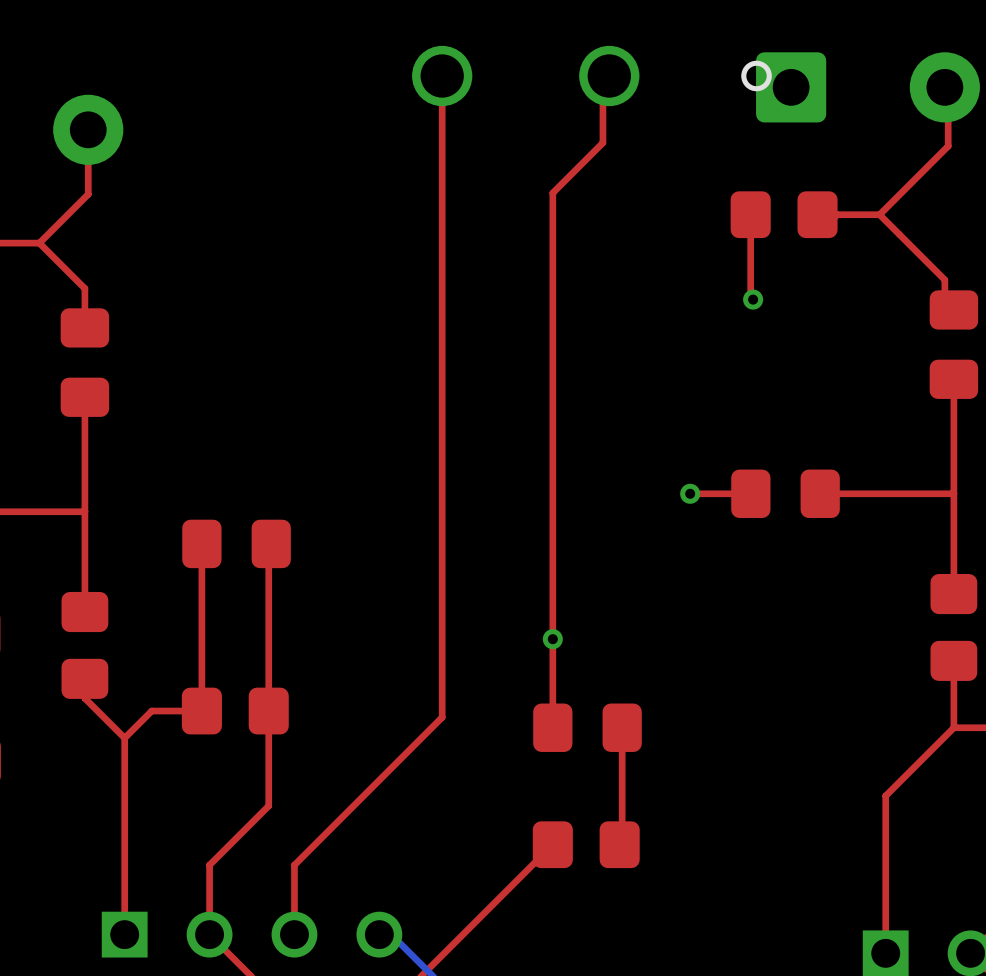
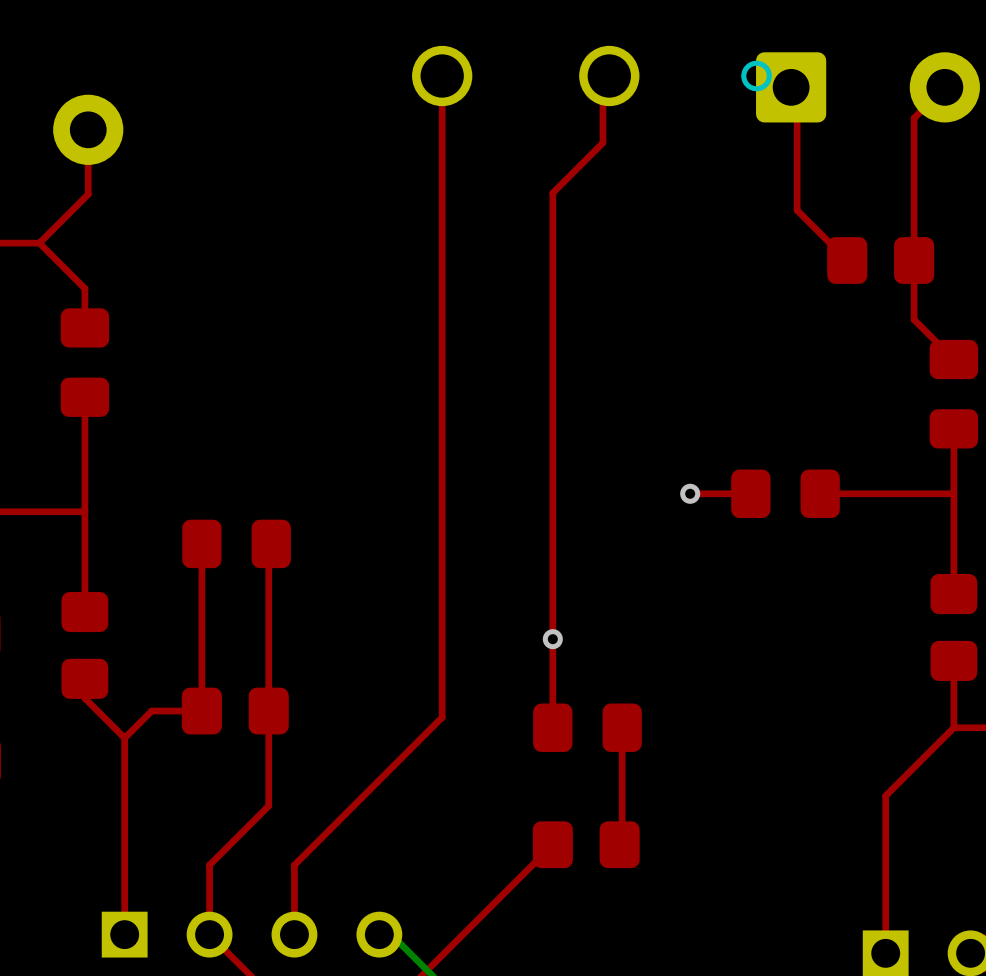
top track: none -> (791, 87) (797, 93) (797, 210) (847, 260)
top track: none -> (944, 87) (914, 118) (914, 319) (953, 359)
top track: (948, 121) (948, 146) (879, 214) -> none
top track: (750, 214) (750, 297) (753, 299) -> none
part position: (784, 214) -> (880, 260)
top track: (879, 214) (944, 279) (944, 319) -> none
top track: (879, 214) (837, 214) (817, 234) -> none
via: (753, 299) -> none
part position: (953, 344) -> (953, 394)
top track: (953, 379) (953, 428) -> none

